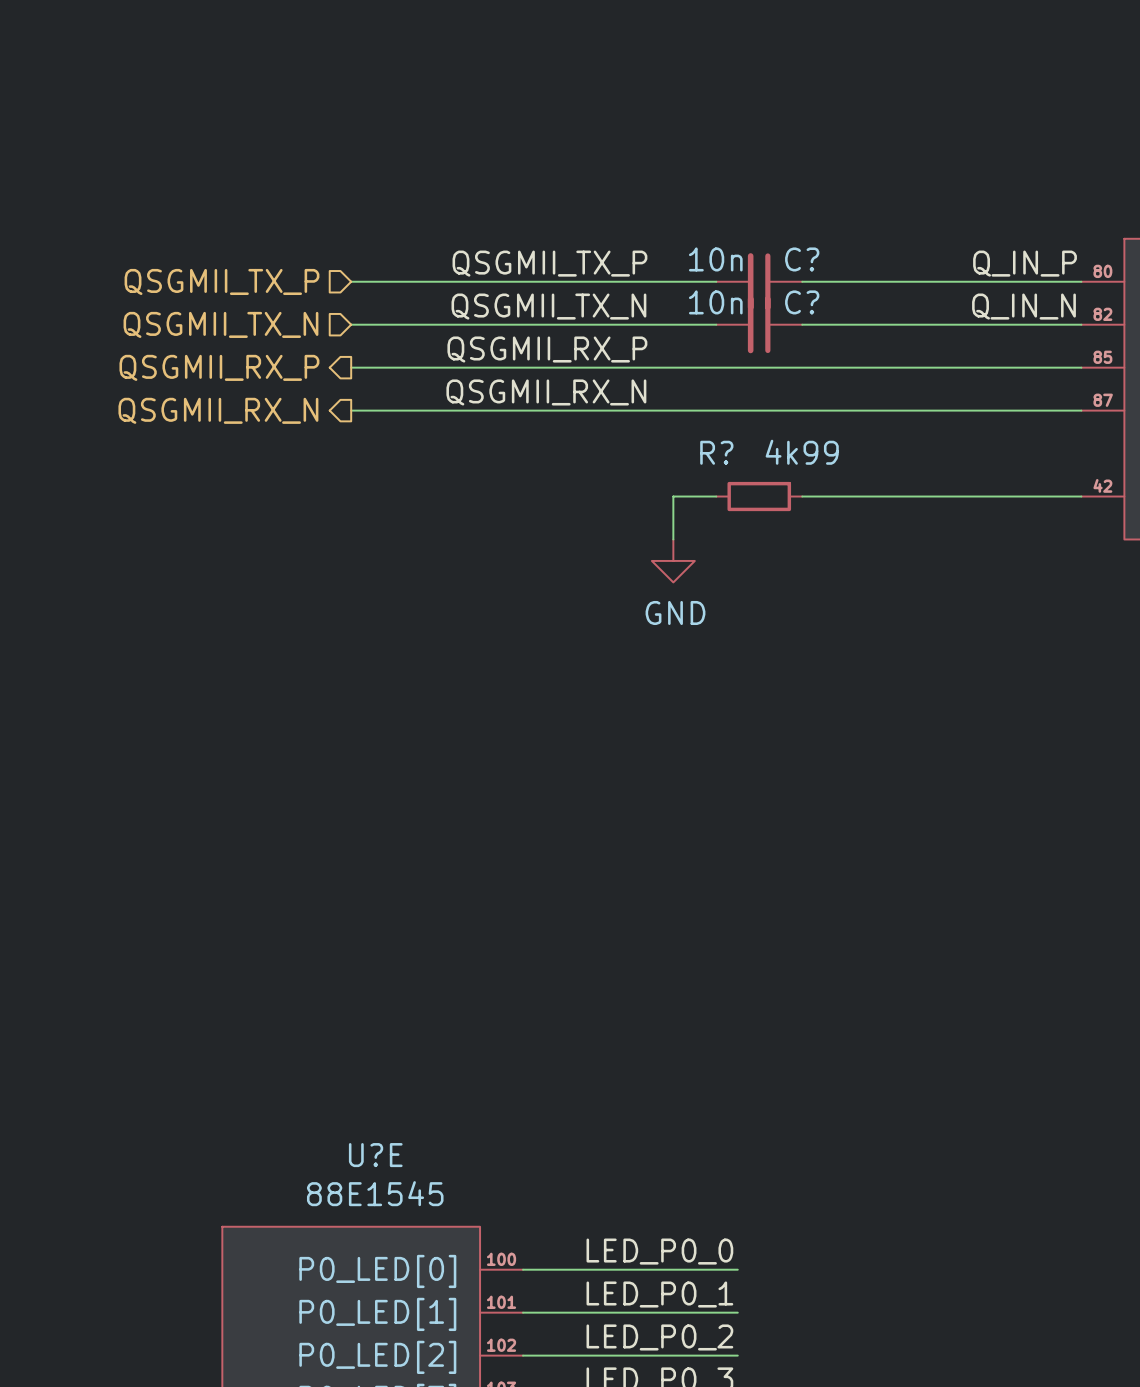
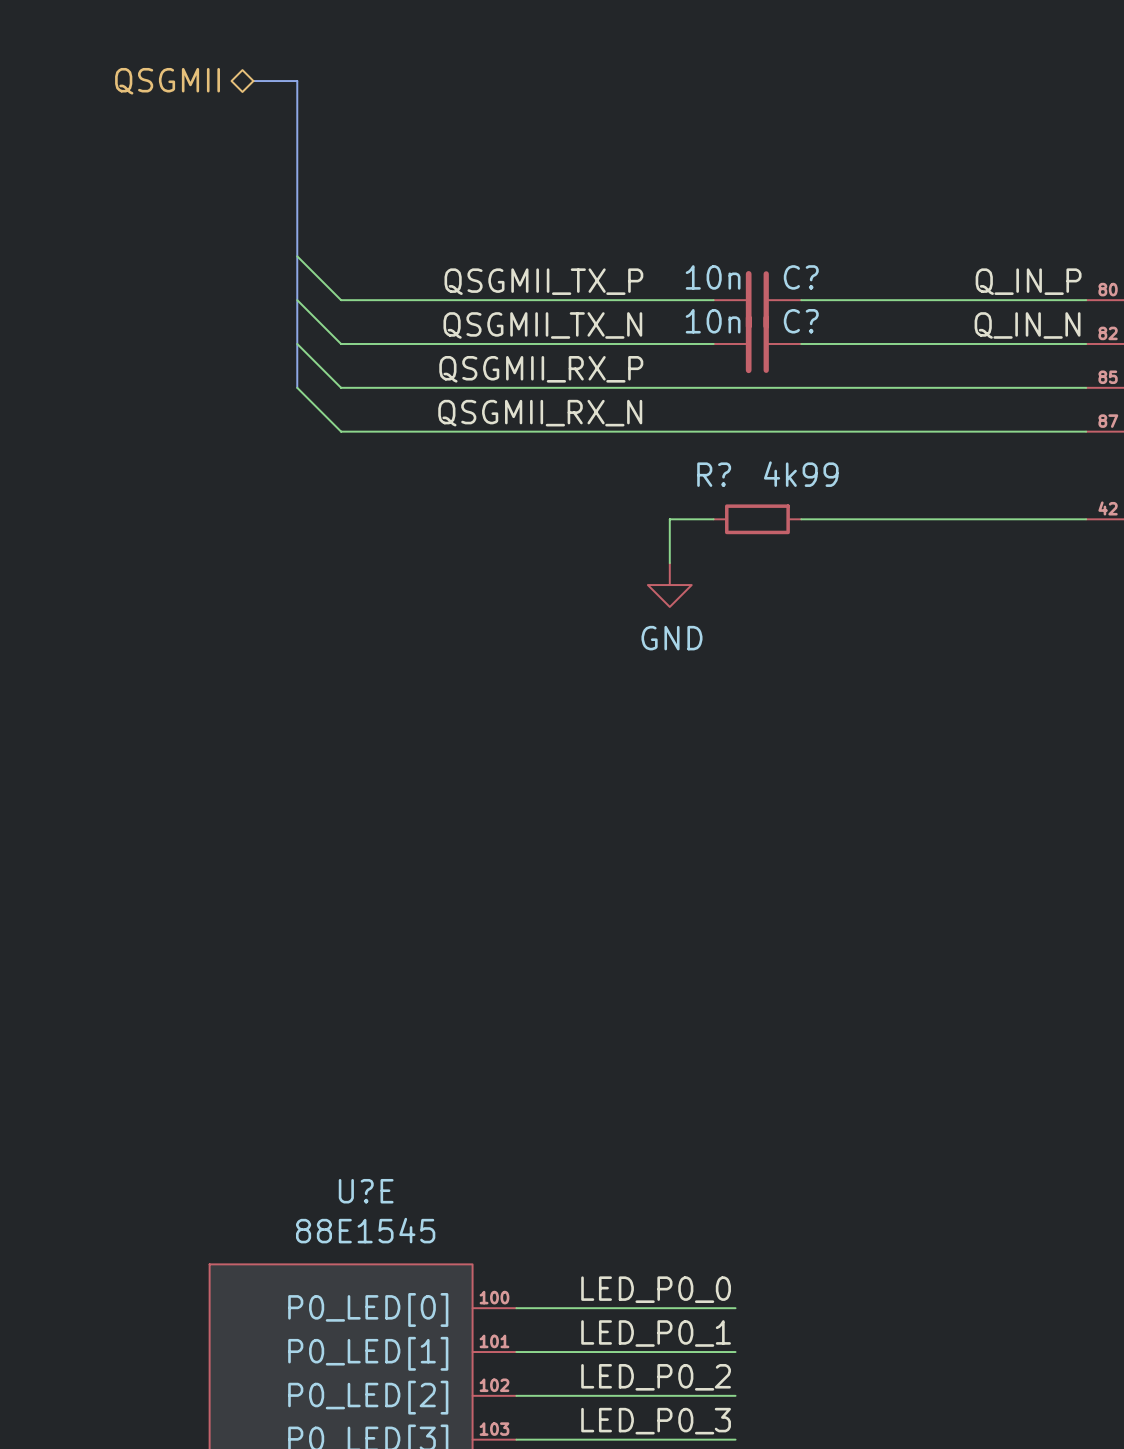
bus: none -> (253, 81) (297, 81) (297, 387)
hierarchical label: none -> QSGMII (167, 81)
wire: none -> (297, 256) (341, 300)
hierarchical label: QSGMII_TX_P (221, 281) -> none
wire: none -> (297, 300) (341, 343)
hierarchical label: QSGMII_TX_N (220, 324) -> none
wire: none -> (297, 343) (341, 387)
hierarchical label: QSGMII_RX_P (219, 367) -> none
wire: none -> (297, 387) (341, 431)
hierarchical label: QSGMII_RX_N (218, 410) -> none

